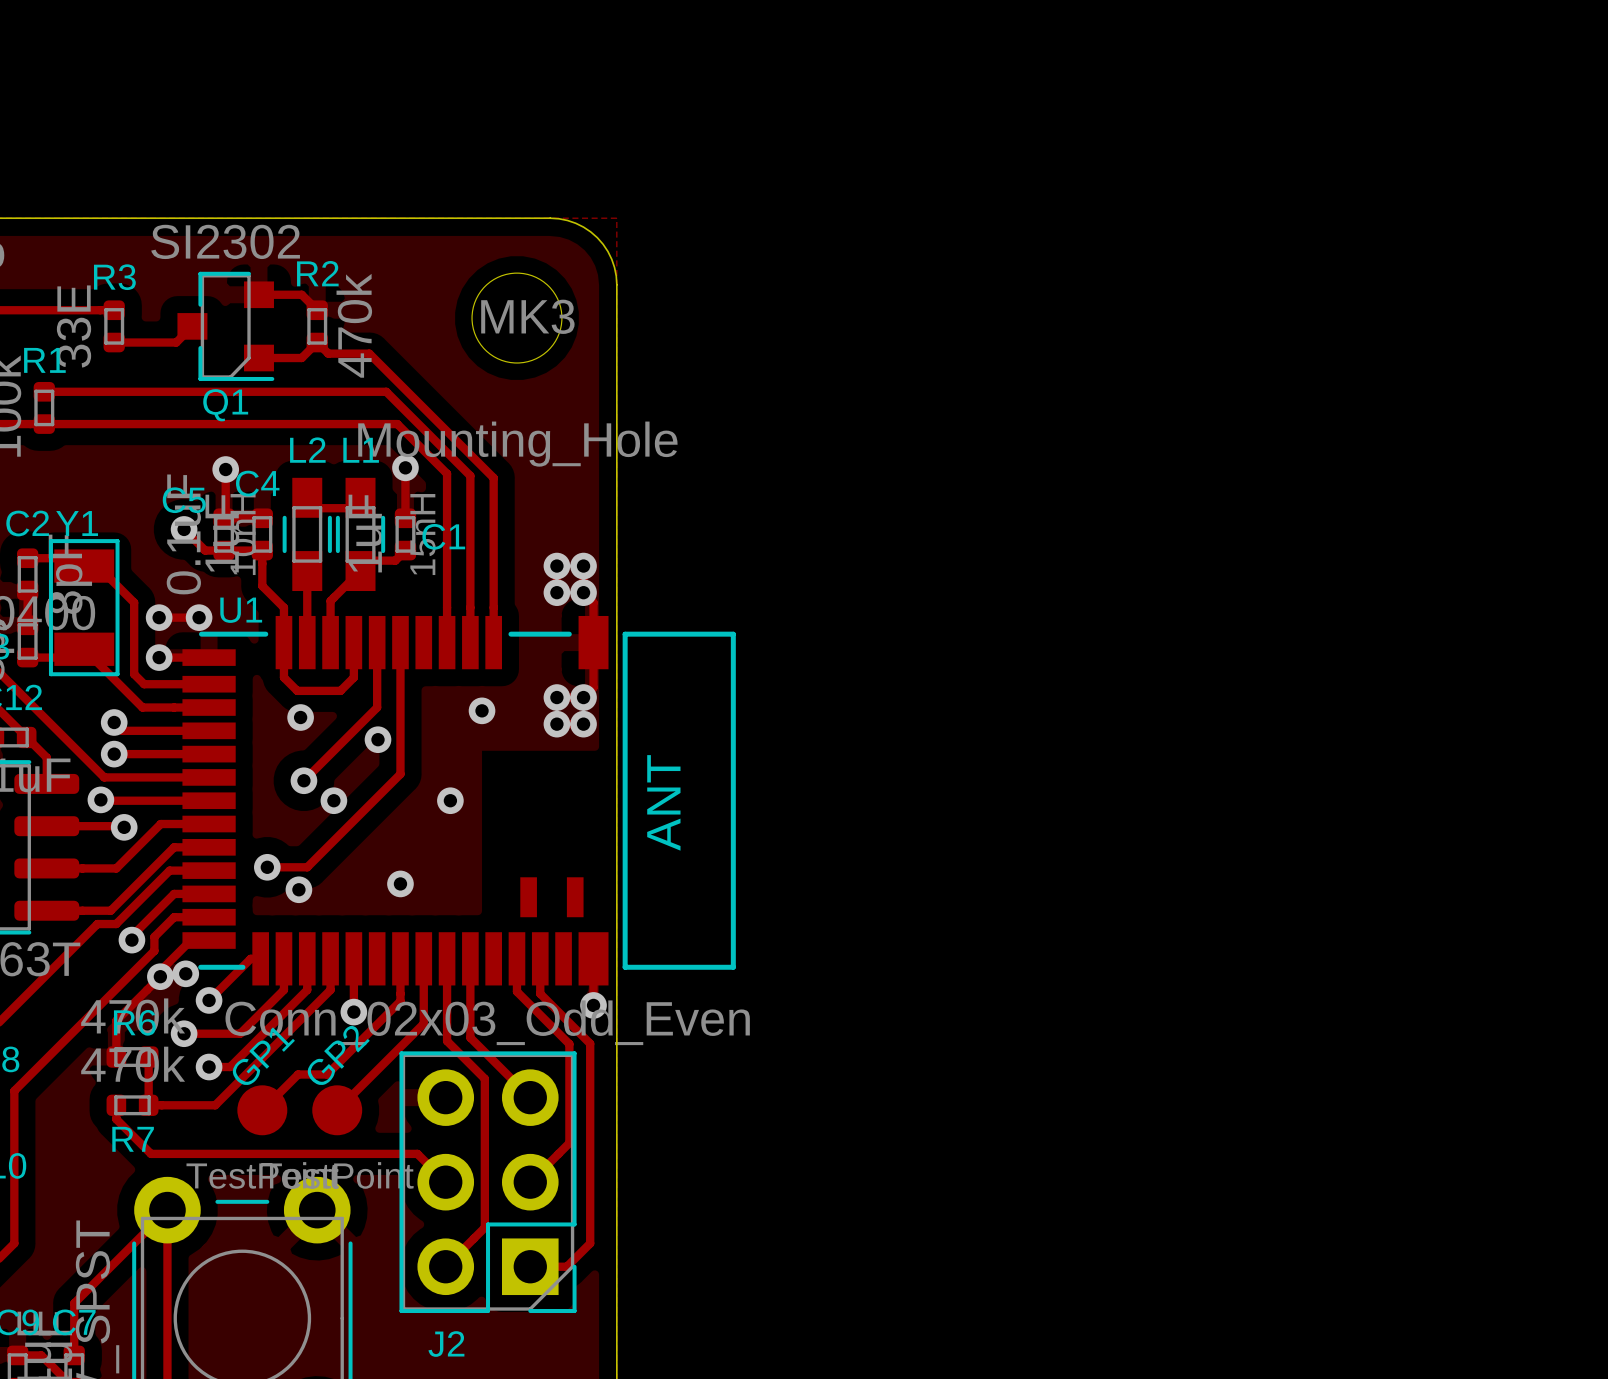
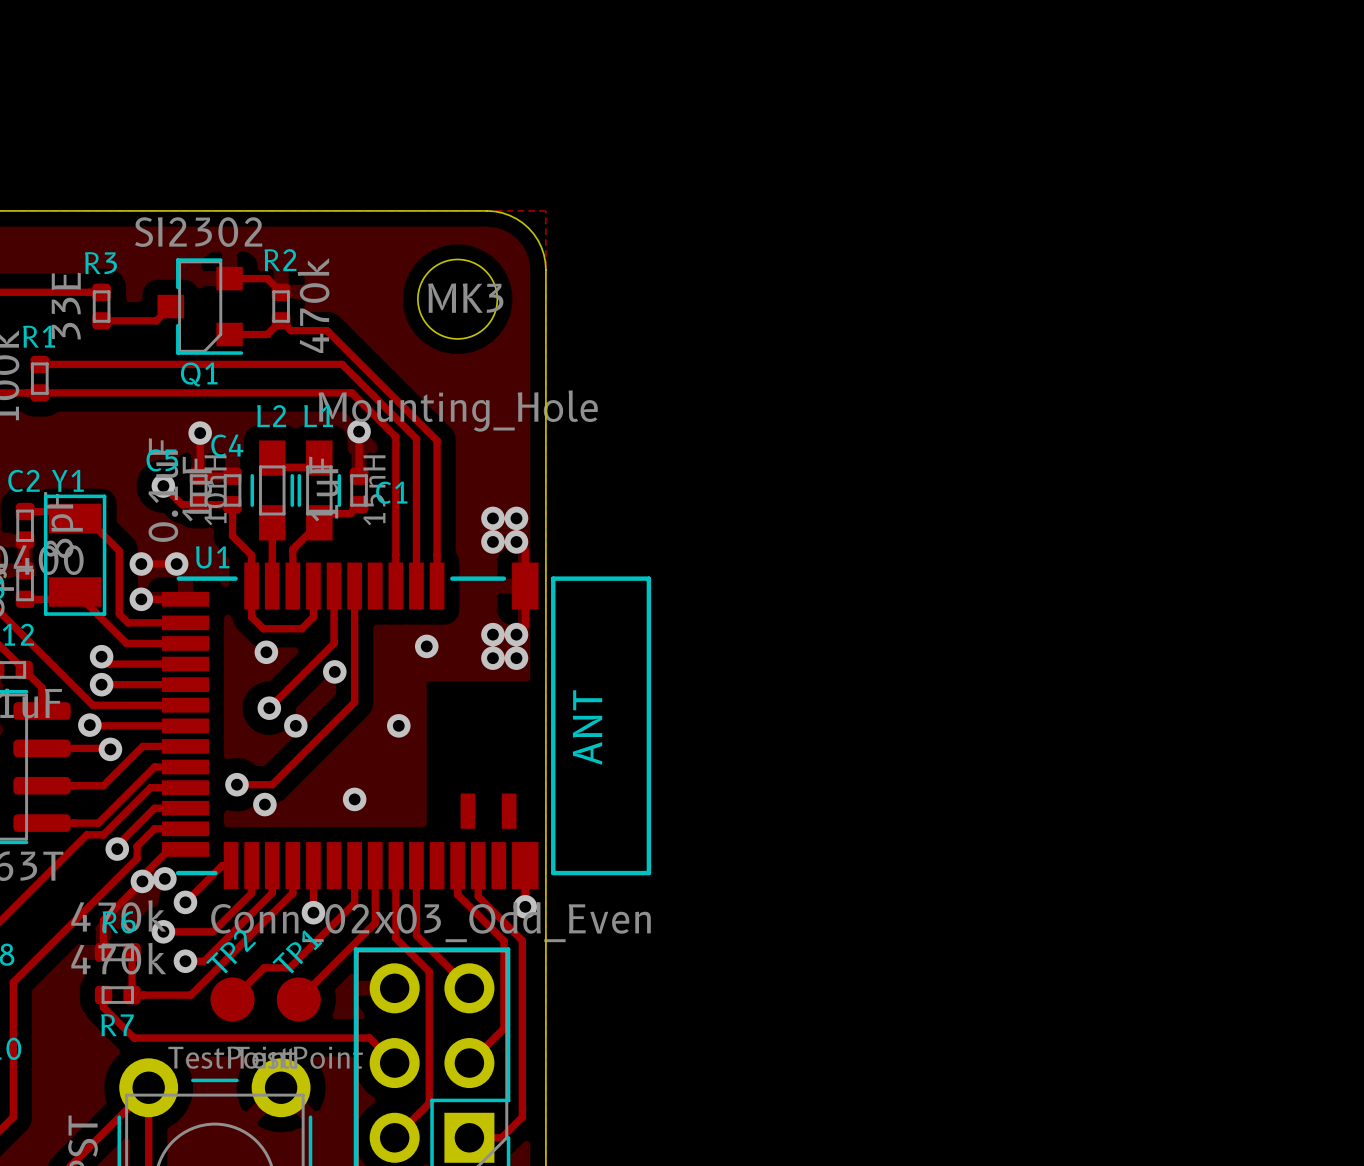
GP2 name: GP2 (338, 1055) -> TP1 (297, 951)
GP1 name: GP1 (263, 1056) -> TP2 (231, 951)

